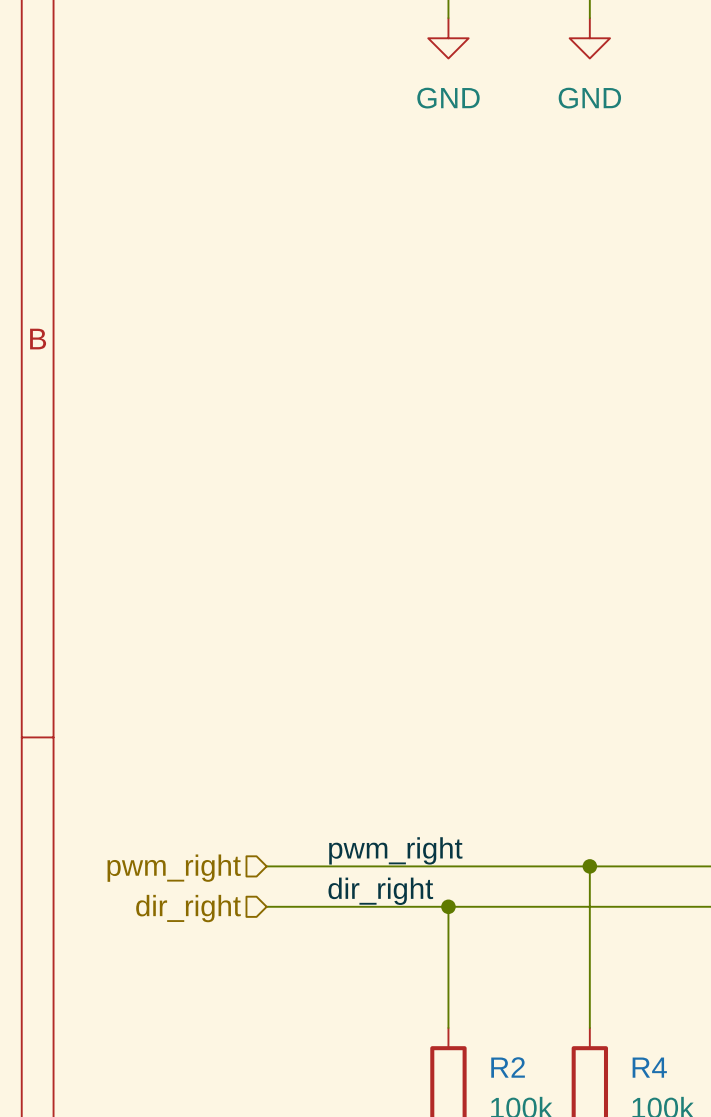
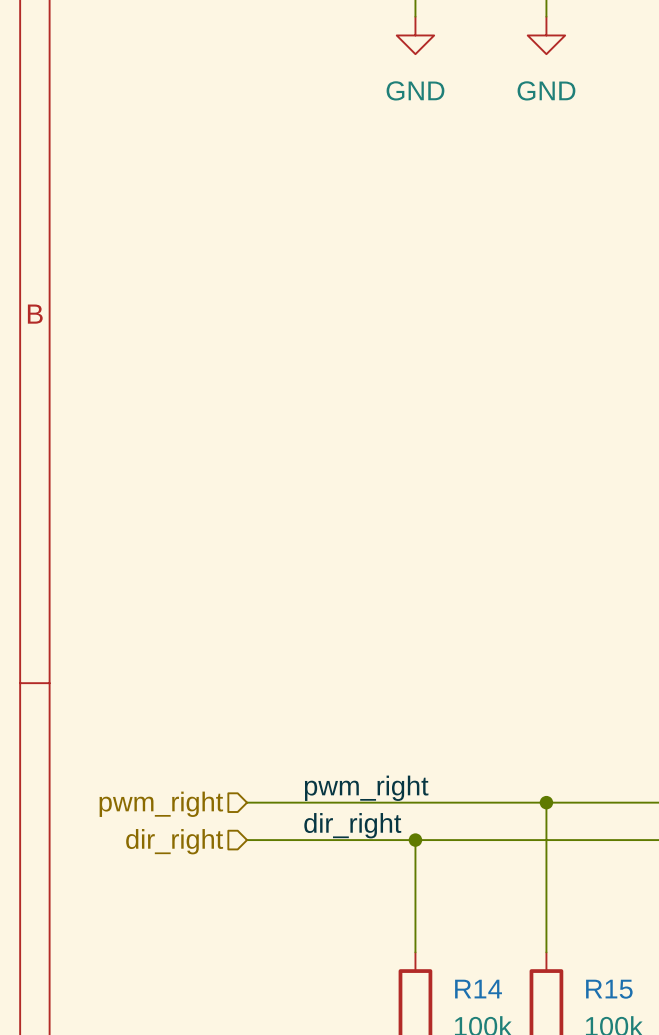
R2 name: R2 (508, 1067) -> R14 (478, 989)
R4 name: R4 (649, 1067) -> R15 (609, 989)

